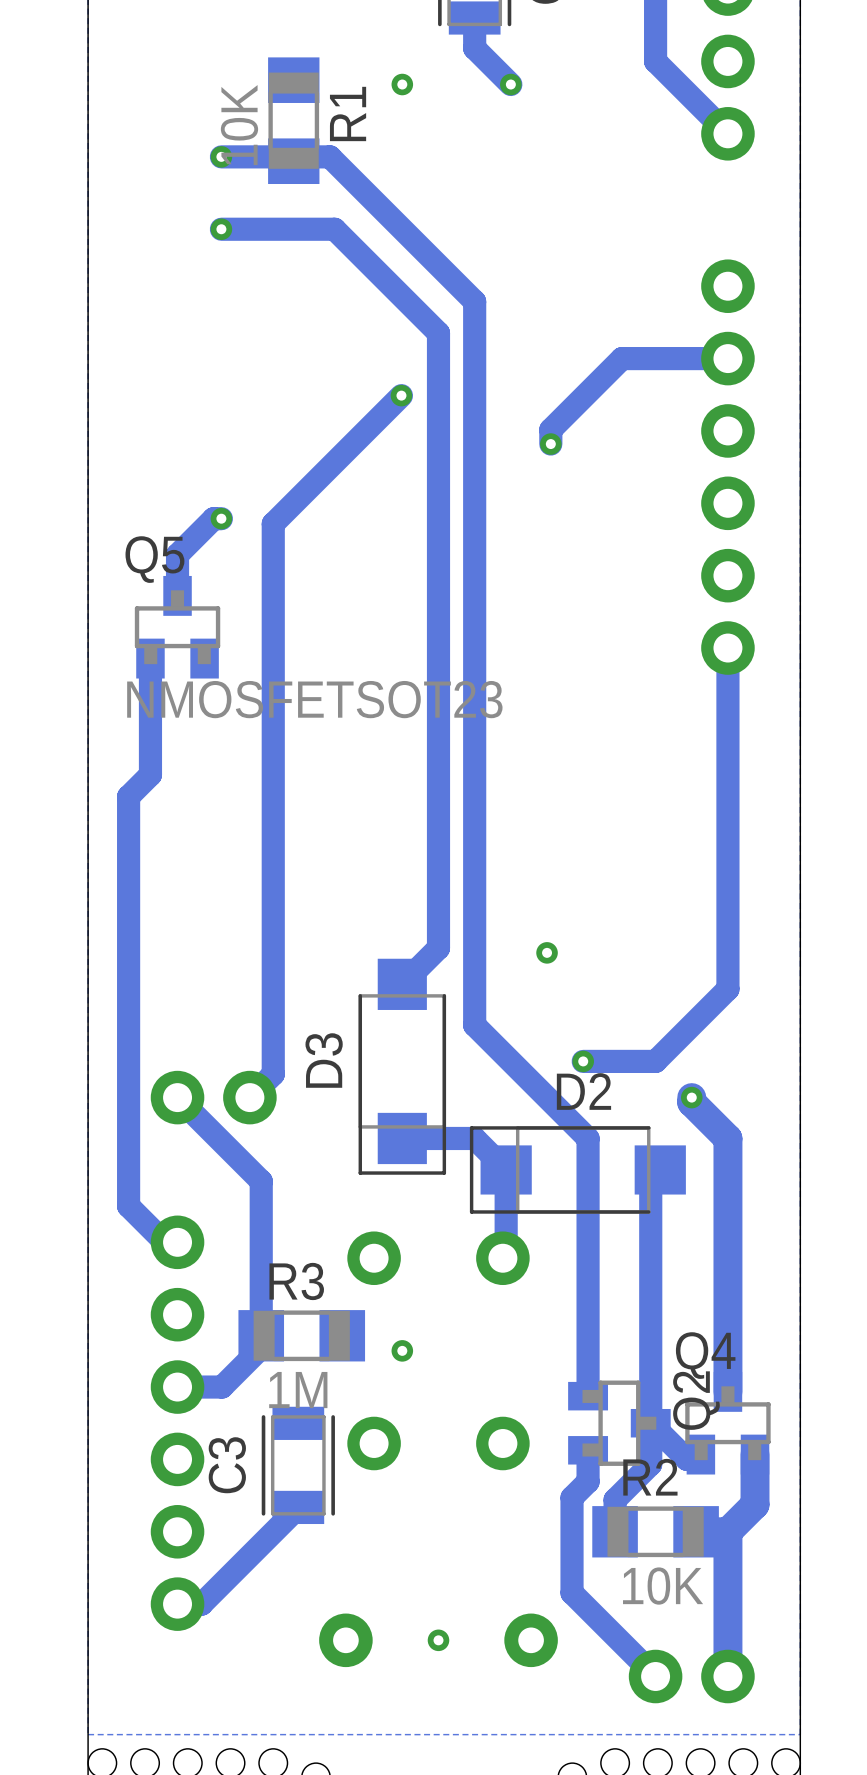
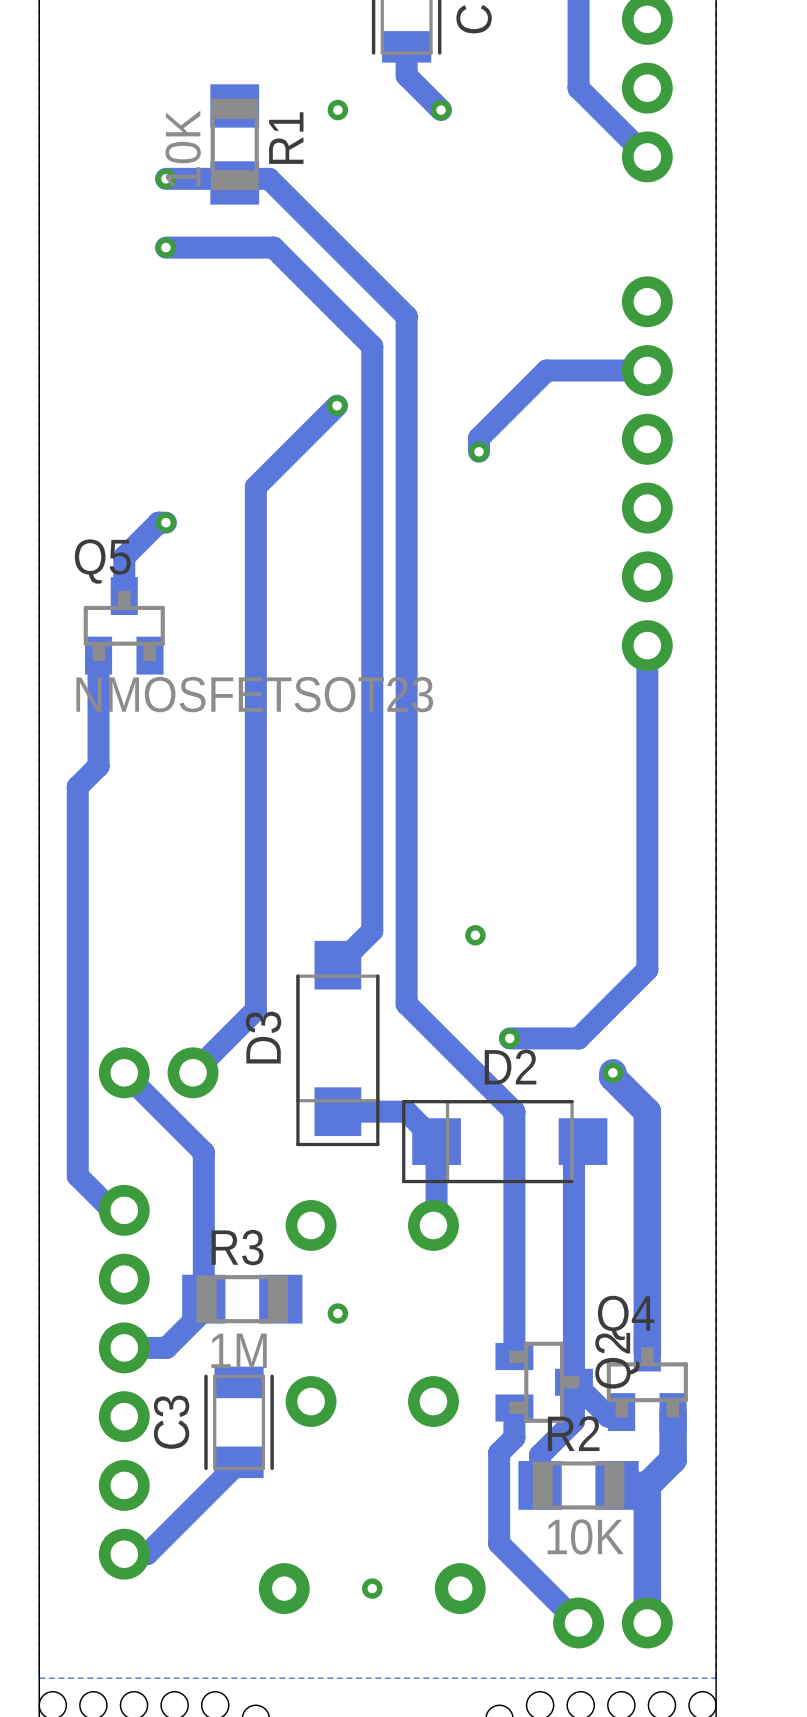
track: (315, 481) (273, 523) (273, 1074) -> (255, 486) (255, 1010) (215, 1050)

